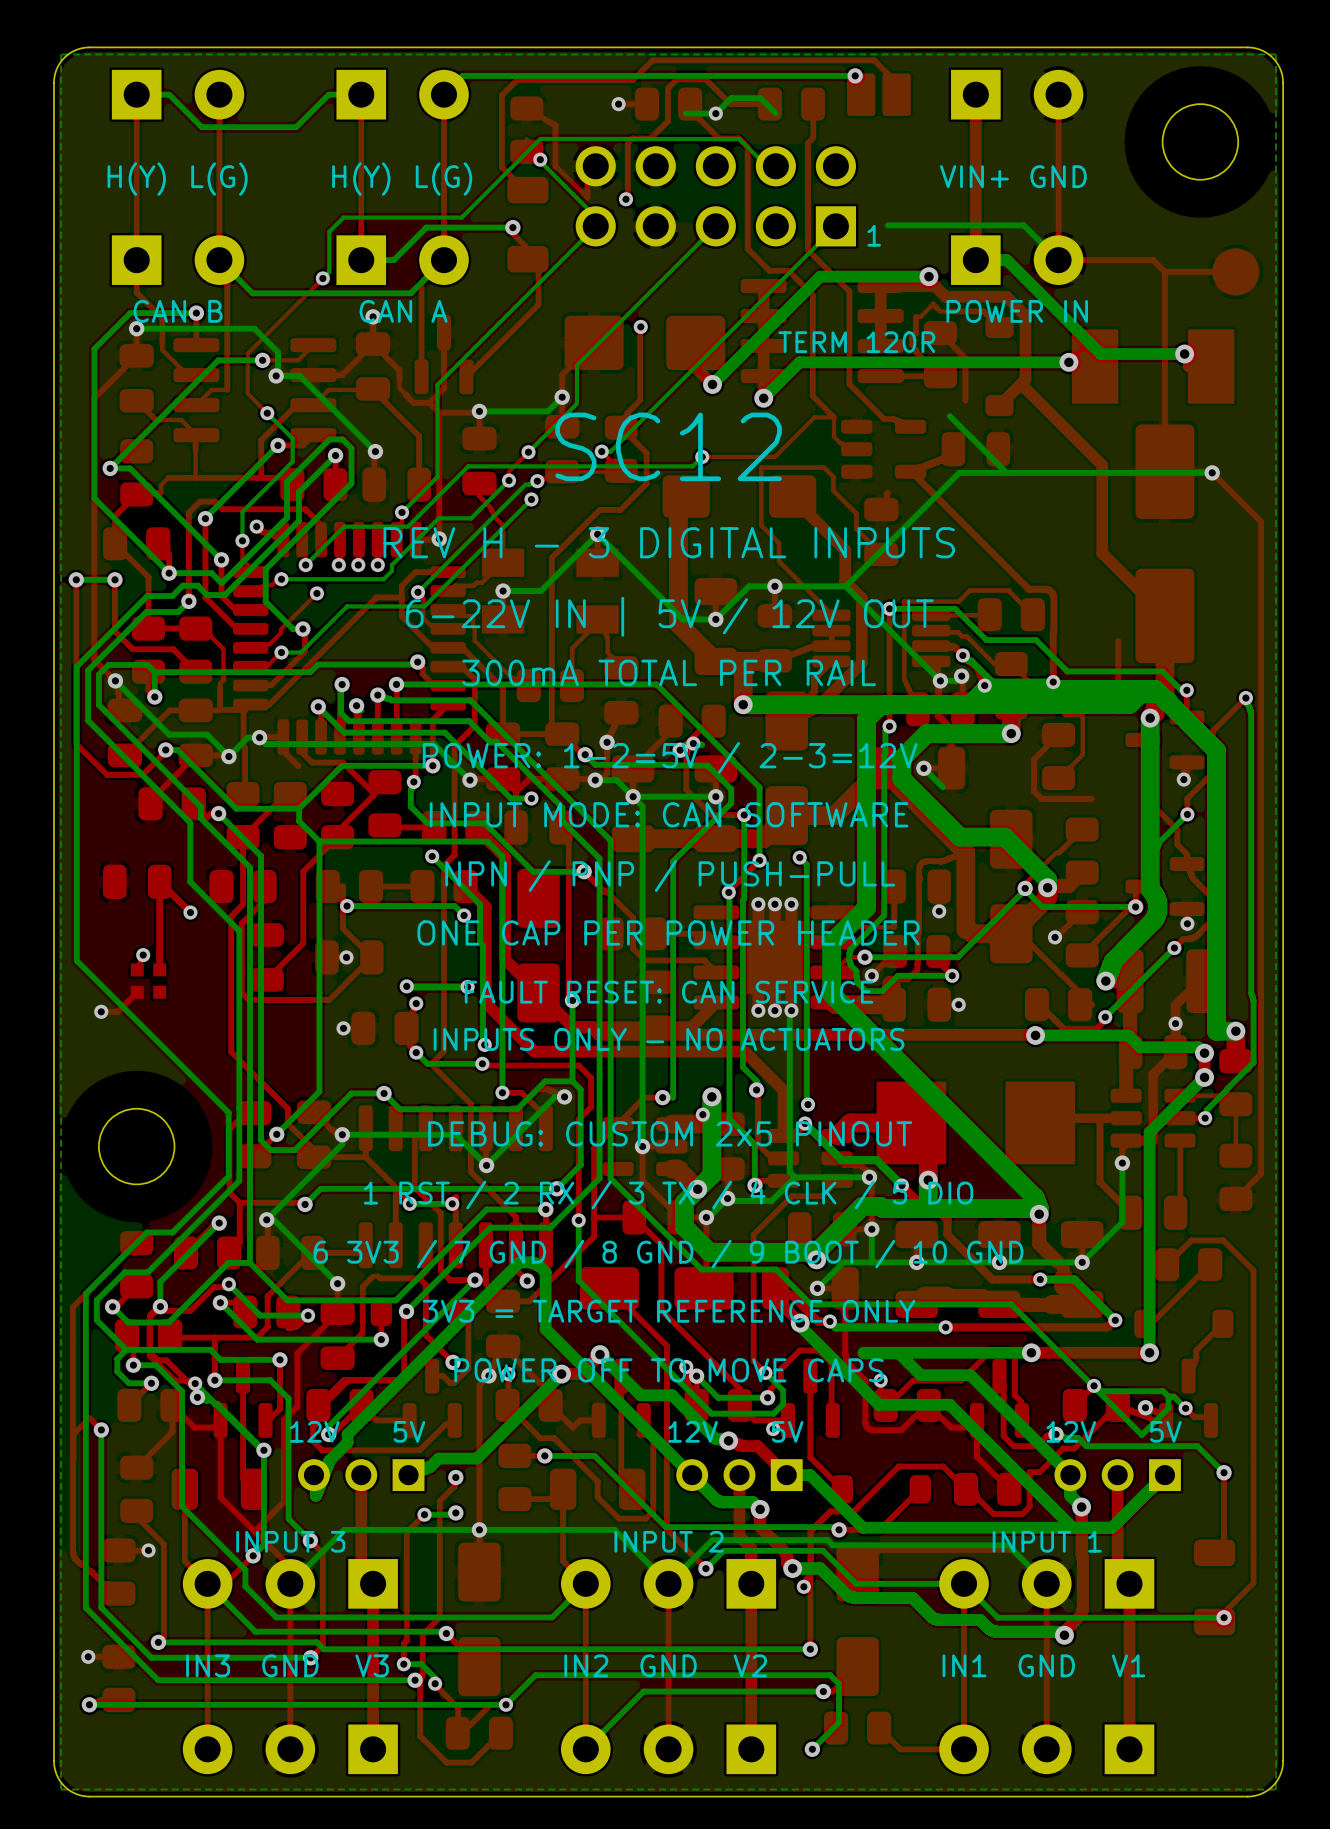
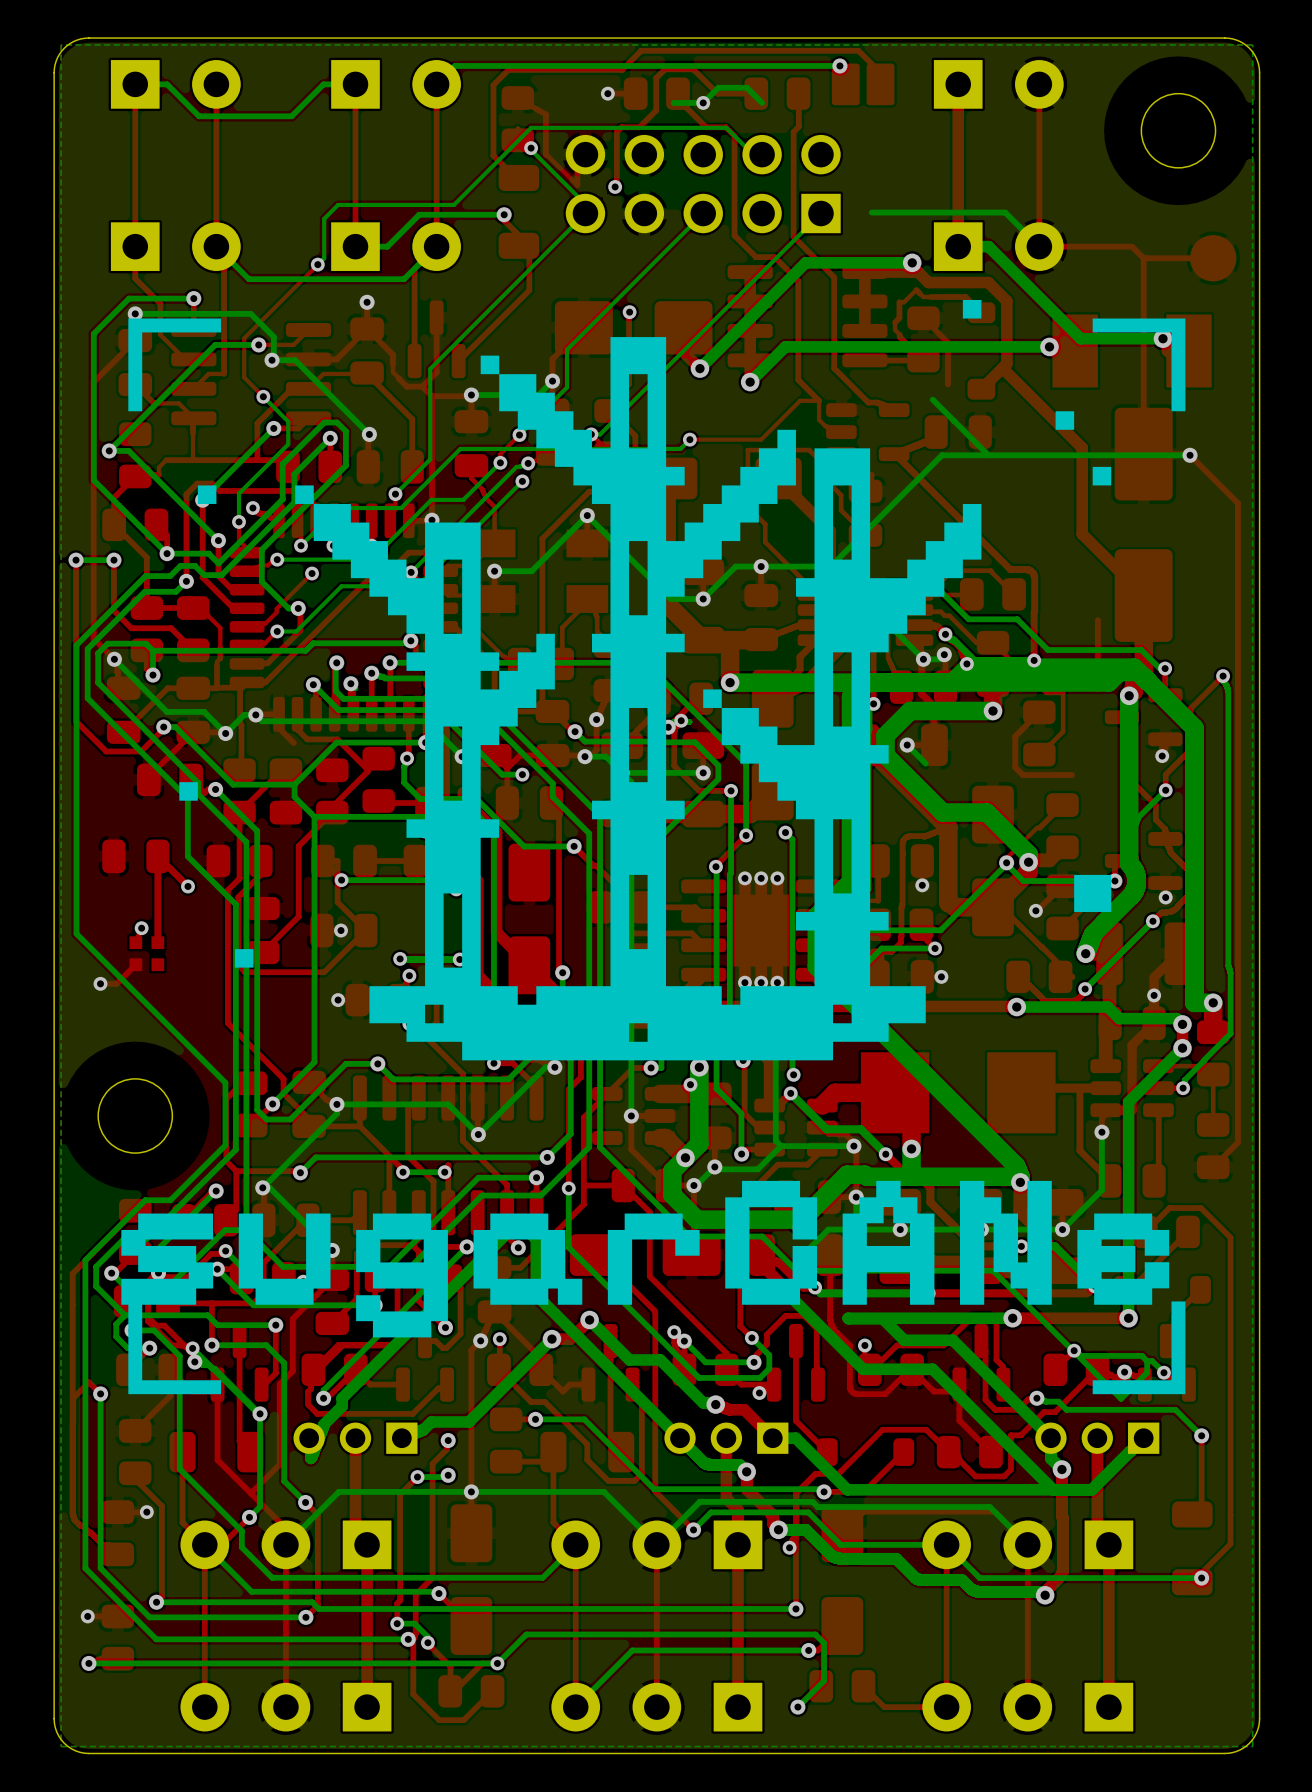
text: VIN+ (974, 176) -> none
text: GND (1058, 176) -> none
text: H(Y) (136, 179) -> none
text: L(G) (219, 179) -> none
text: H(Y) (361, 179) -> none
text: L(G) (443, 179) -> none
text: 1 (874, 235) -> none
text: CAN B (178, 311) -> none
text: CAN A (403, 311) -> none
text: POWER IN (1017, 311) -> none
drawing: none -> [295, 299, 982, 1061]
drawing: none -> [128, 318, 222, 412]
drawing: none -> [1055, 318, 1186, 430]
text: TERM 120R (856, 342) -> none
text: SC12 (668, 446) -> none
drawing: none -> [1092, 466, 1112, 486]
drawing: none -> [197, 485, 217, 504]
text: REV H - 3 DIGITAL INPUTS (669, 542) -> none
text: 6-22V IN | 5V / 12V OUT (669, 616) -> none
text: 300mA TOTAL PER RAIL (669, 672) -> none
text: POWER: 1-2=5V / 2-3=12V (670, 757) -> none
drawing: none -> [179, 782, 198, 801]
text: INPUT MODE: CAN SOFTWARE (669, 814) -> none
text: NPN / PNP / PUSH-PULL (670, 876) -> none
drawing: none -> [1074, 874, 1112, 912]
text: ONE CAP PER POWER HEADER (668, 932) -> none
drawing: none -> [234, 949, 254, 968]
text: FAULT RESET: CAN SERVICE (669, 992) -> none
text: INPUTS ONLY - NO ACTUATORS (669, 1039) -> none
text: DEBUG: CUSTOM 2x5 PINOUT (670, 1133) -> none
text: 1 RST / 2 RX / 3 TX / 4 CLK / 5 DIO (668, 1194) -> none
drawing: none -> [121, 1180, 1186, 1395]
text: 6 3V3 / 7 GND / 8 GND / 9 BOOT / 10 GND (668, 1254) -> none
text: 3V3 = TARGET REFERENCE ONLY (669, 1311) -> none
text: POWER OFF TO MOVE CAPS (669, 1370) -> none
text: 12V (314, 1431) -> none
text: 5V (409, 1431) -> none
text: 12V (693, 1431) -> none
text: 5V (787, 1431) -> none
text: 12V (1071, 1431) -> none
text: 5V (1165, 1431) -> none
text: INPUT 3 (290, 1541) -> none
text: INPUT 2 (669, 1541) -> none
text: INPUT 1 (1047, 1541) -> none
text: IN3 (208, 1665) -> none
text: GND (290, 1665) -> none
text: V3 (372, 1665) -> none
text: IN2 (586, 1665) -> none
text: GND (668, 1665) -> none
text: V2 (750, 1665) -> none
text: IN1 (964, 1665) -> none
text: GND (1046, 1665) -> none
text: V1 (1128, 1665) -> none

